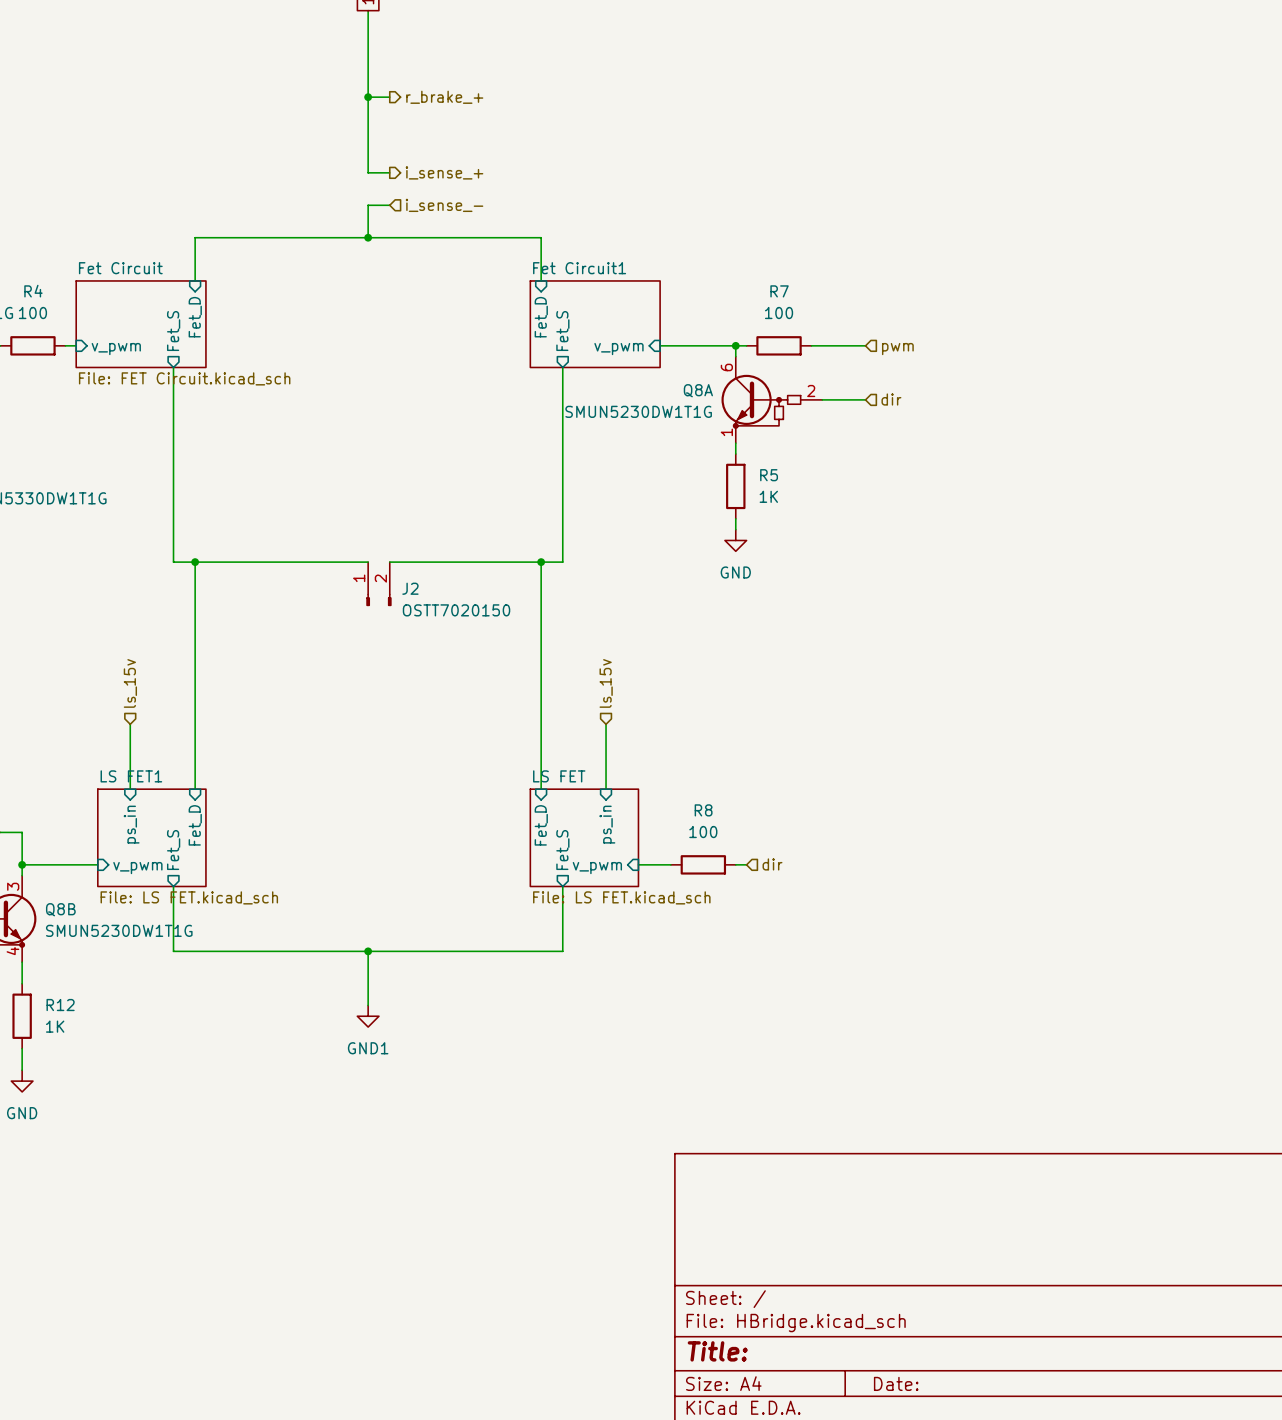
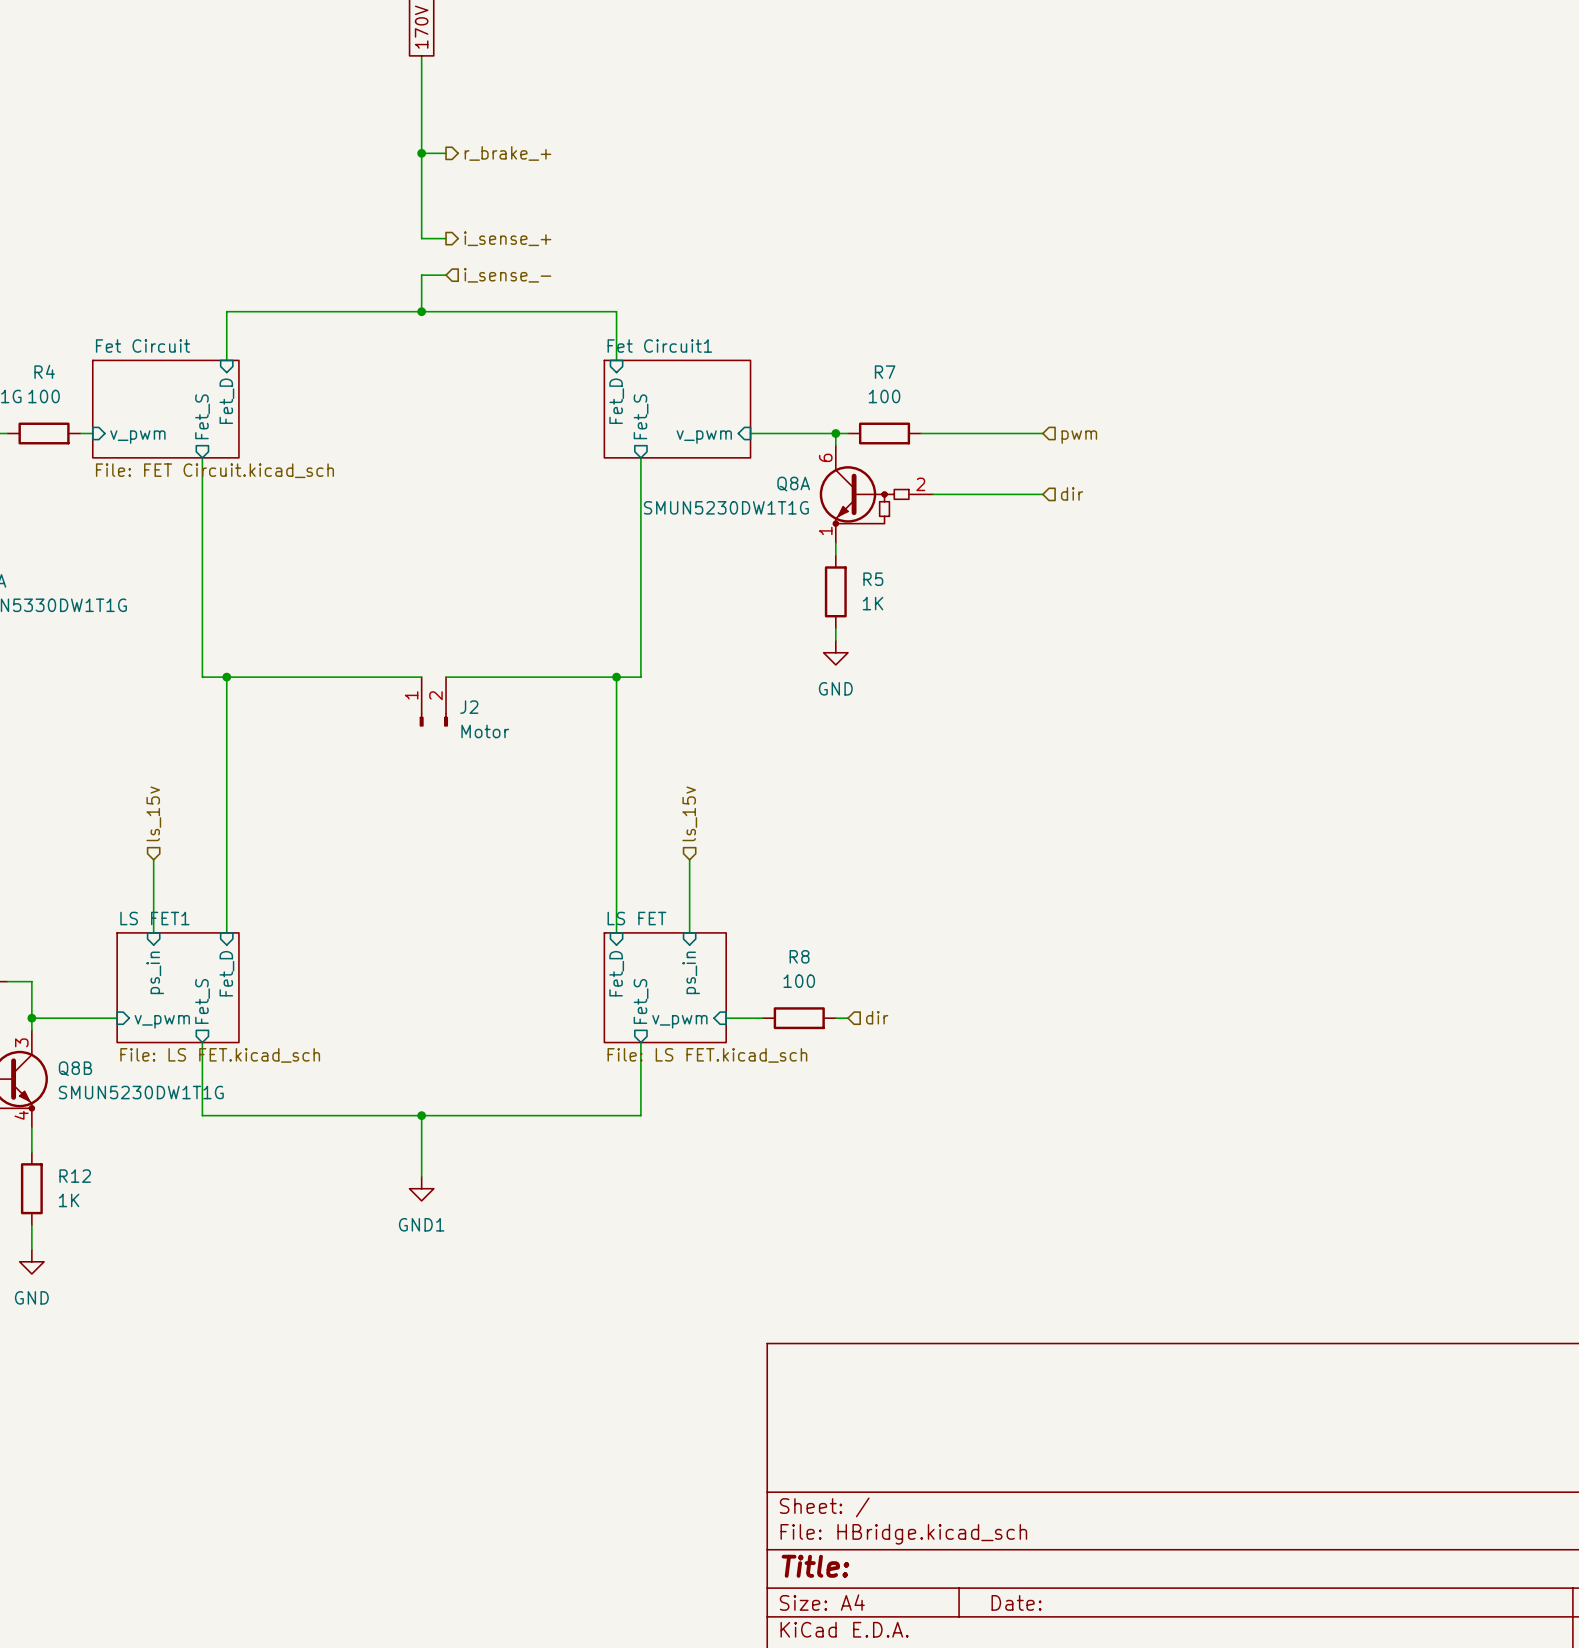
wire: none -> (981, 433) (1042, 433)
hierarchical label position: pwm (897, 349) -> pwm (1079, 437)
wire: none -> (981, 494) (1042, 494)
hierarchical label position: dir (891, 399) -> dir (1072, 493)
J2 value: OSTT7020150 (456, 610) -> Motor (485, 731)

